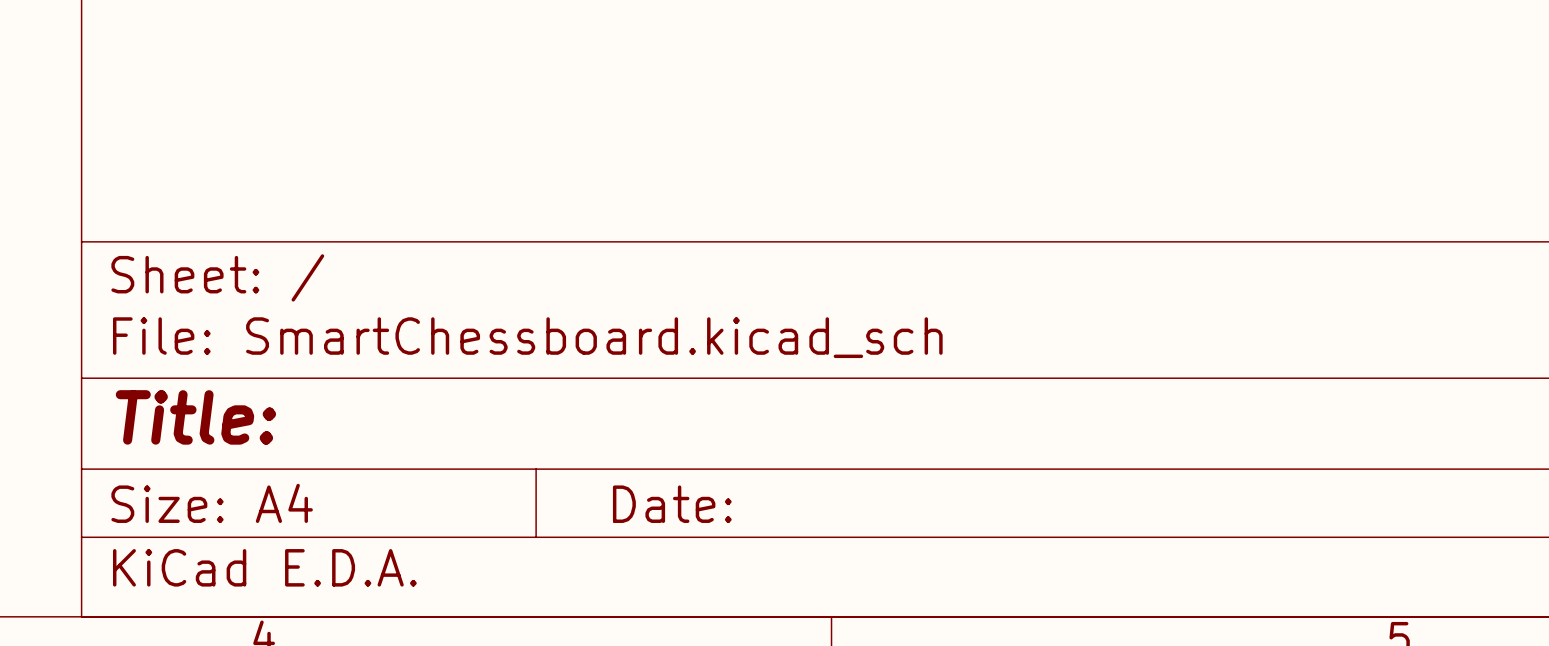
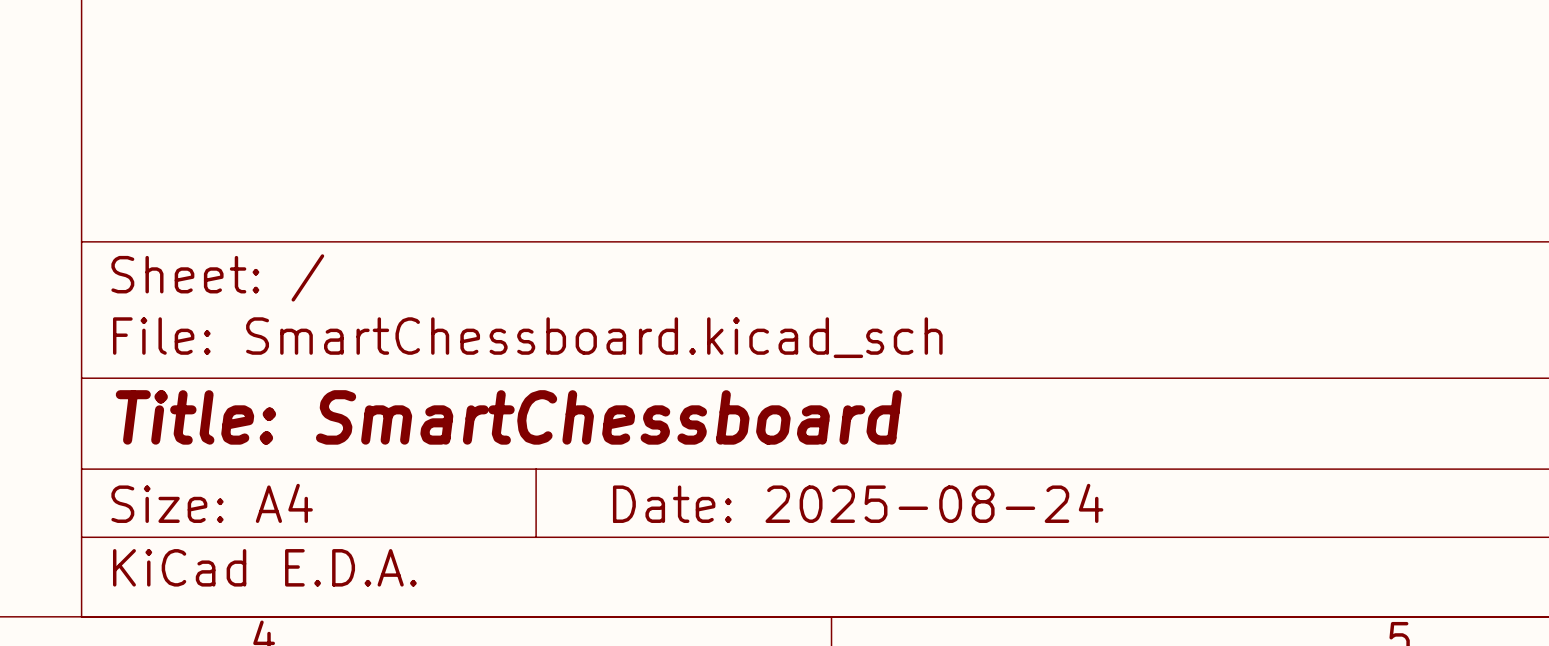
title block: Title: (195, 417) -> Title: SmartChessboard (508, 417)
title block: Date: (672, 504) -> Date: 2025-08-24 (858, 503)

